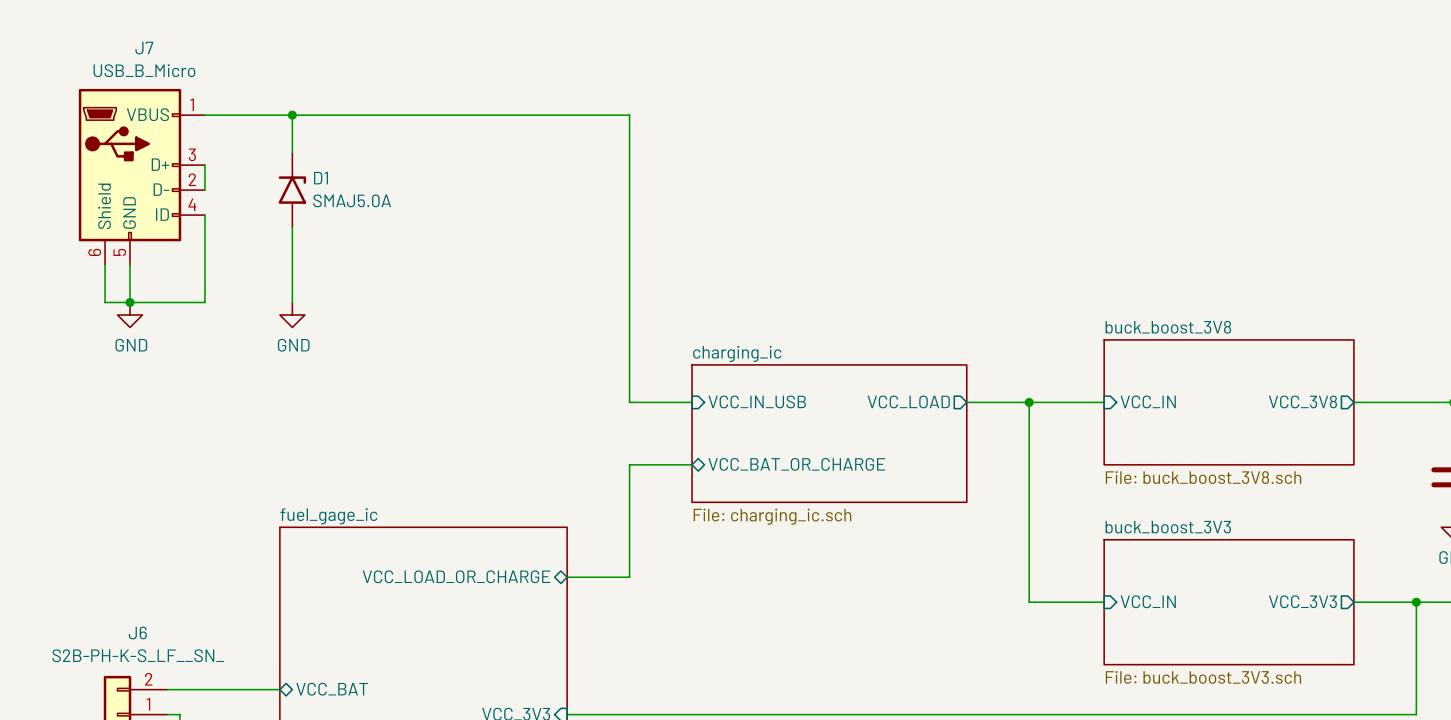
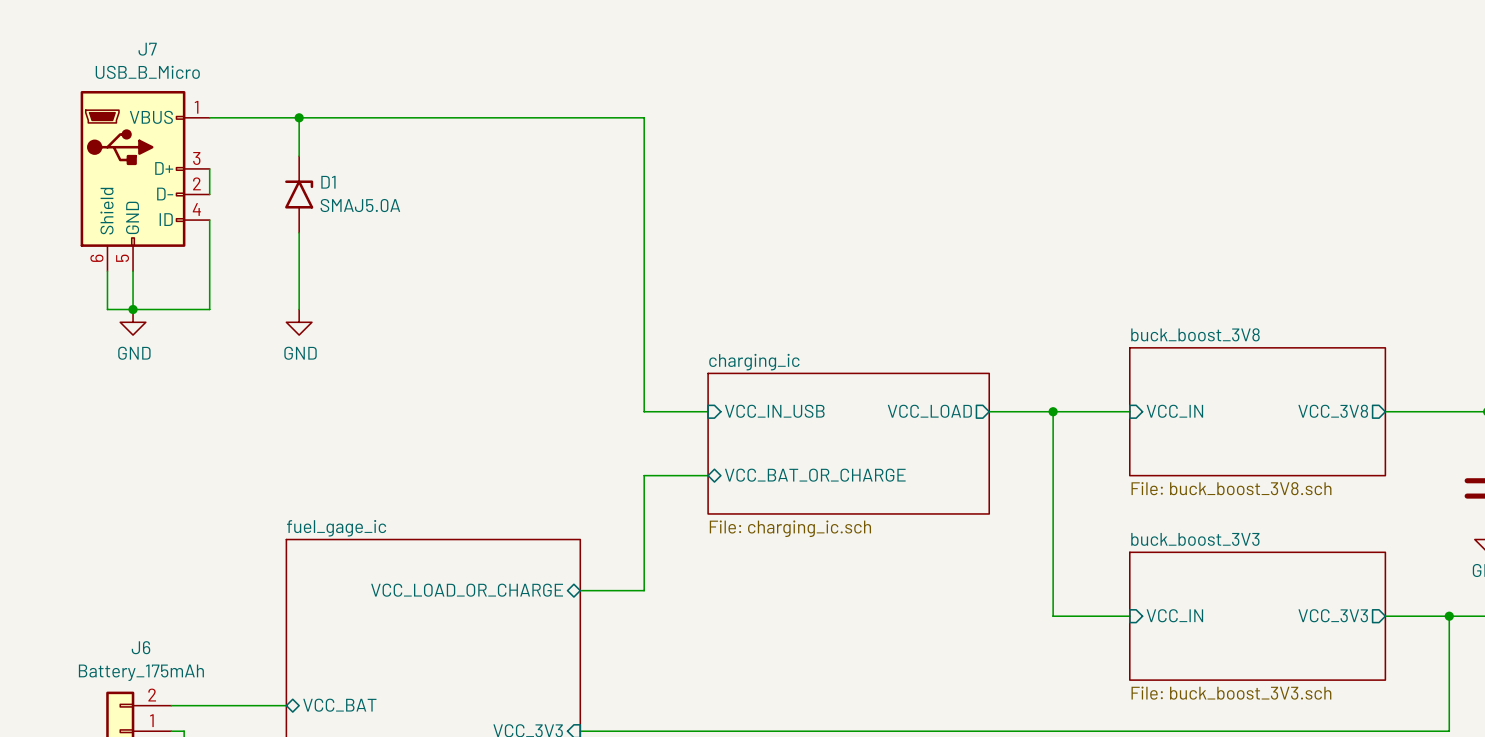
J6 value: S2B-PH-K-S_LF__SN_ (138, 655) -> Battery_175mAh (141, 672)

